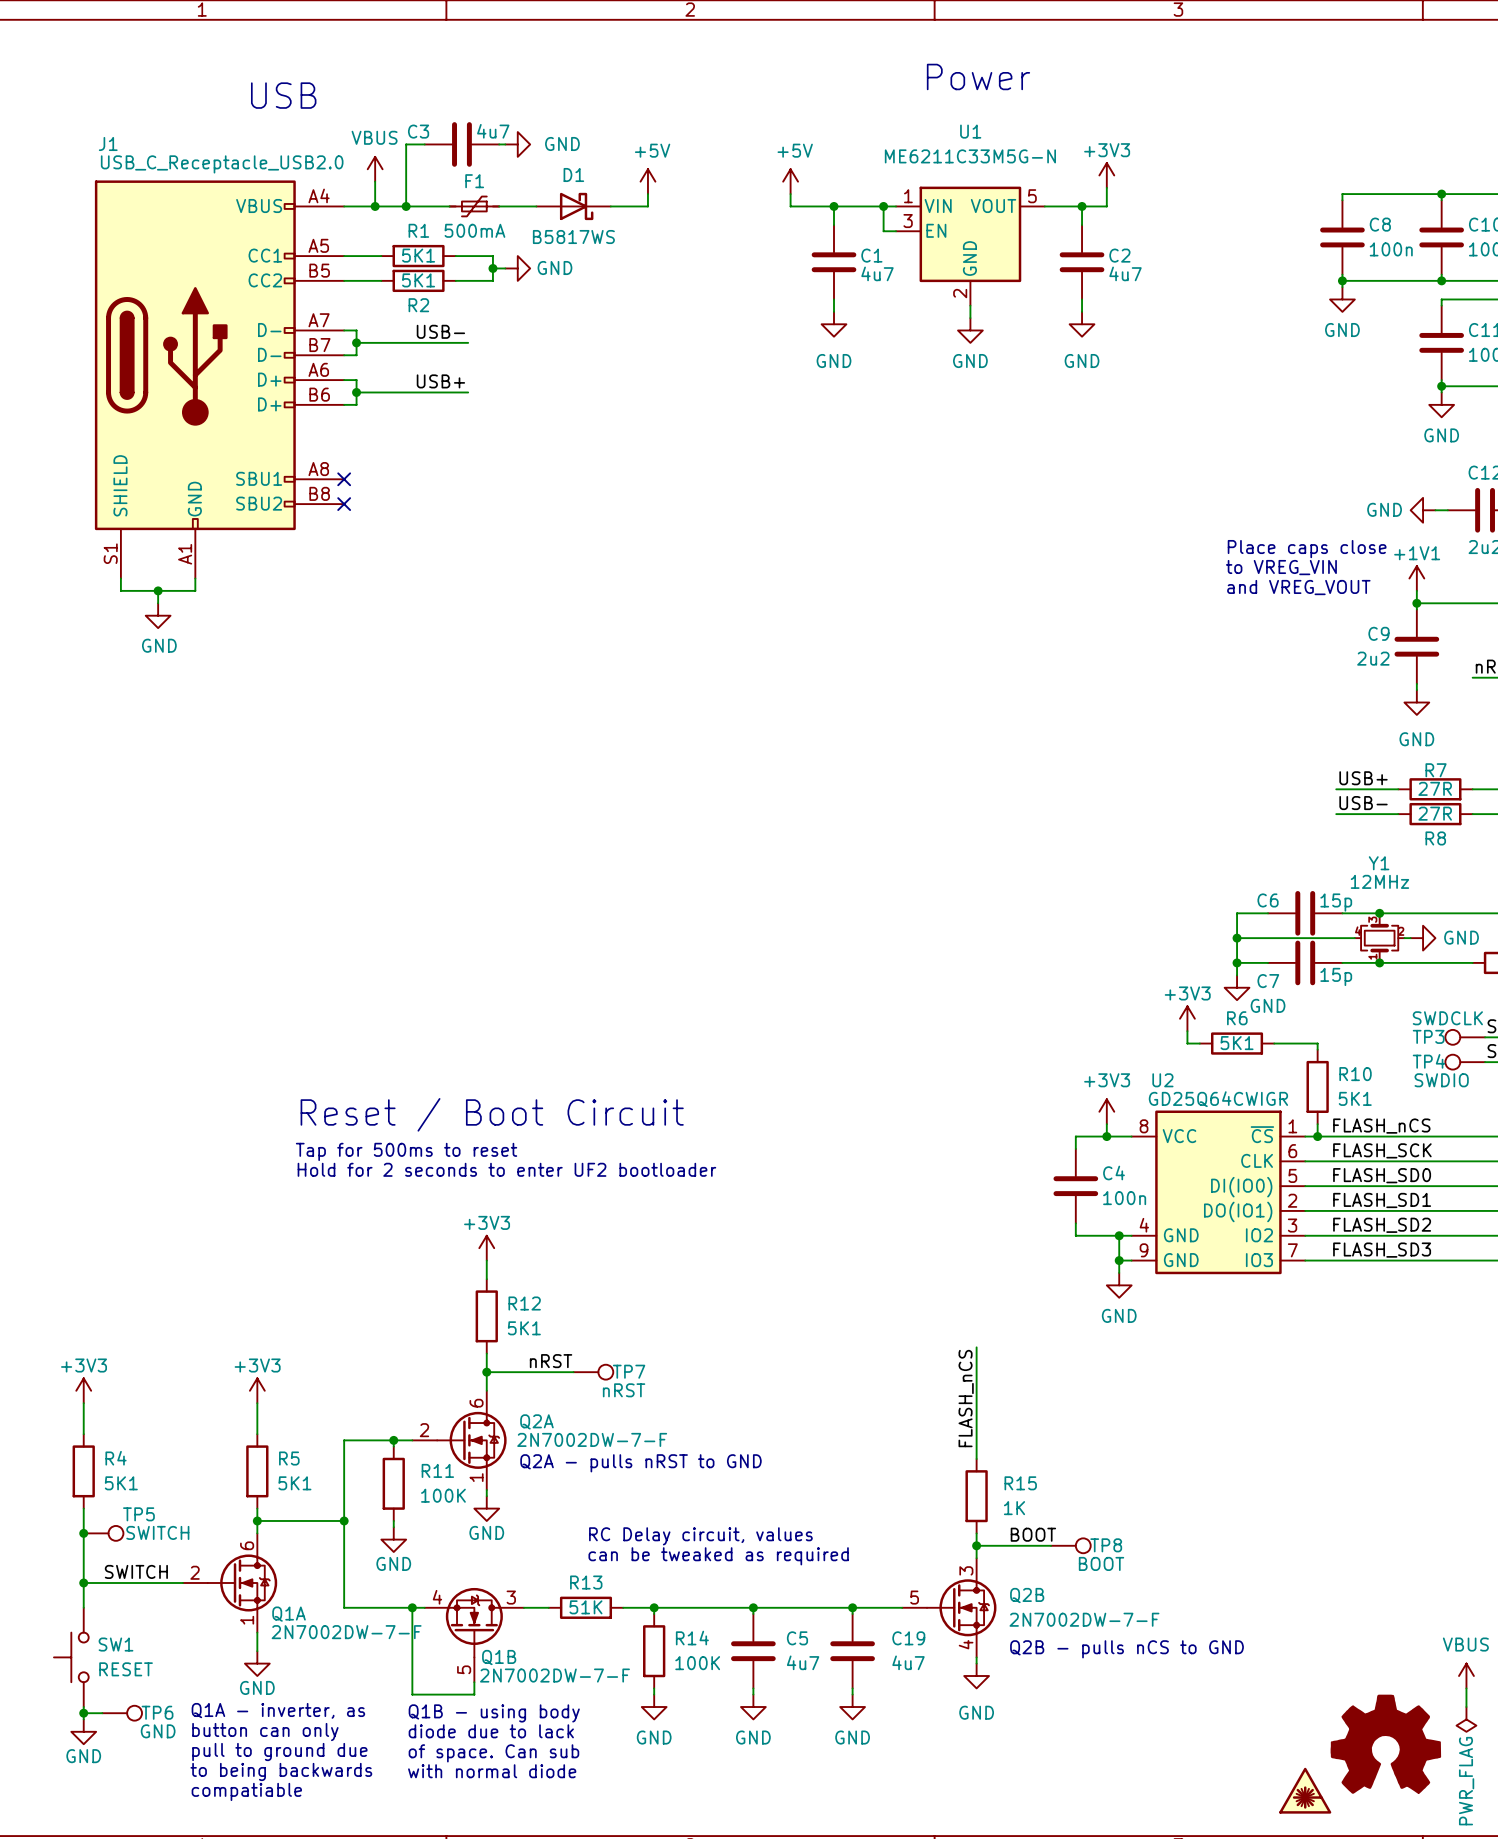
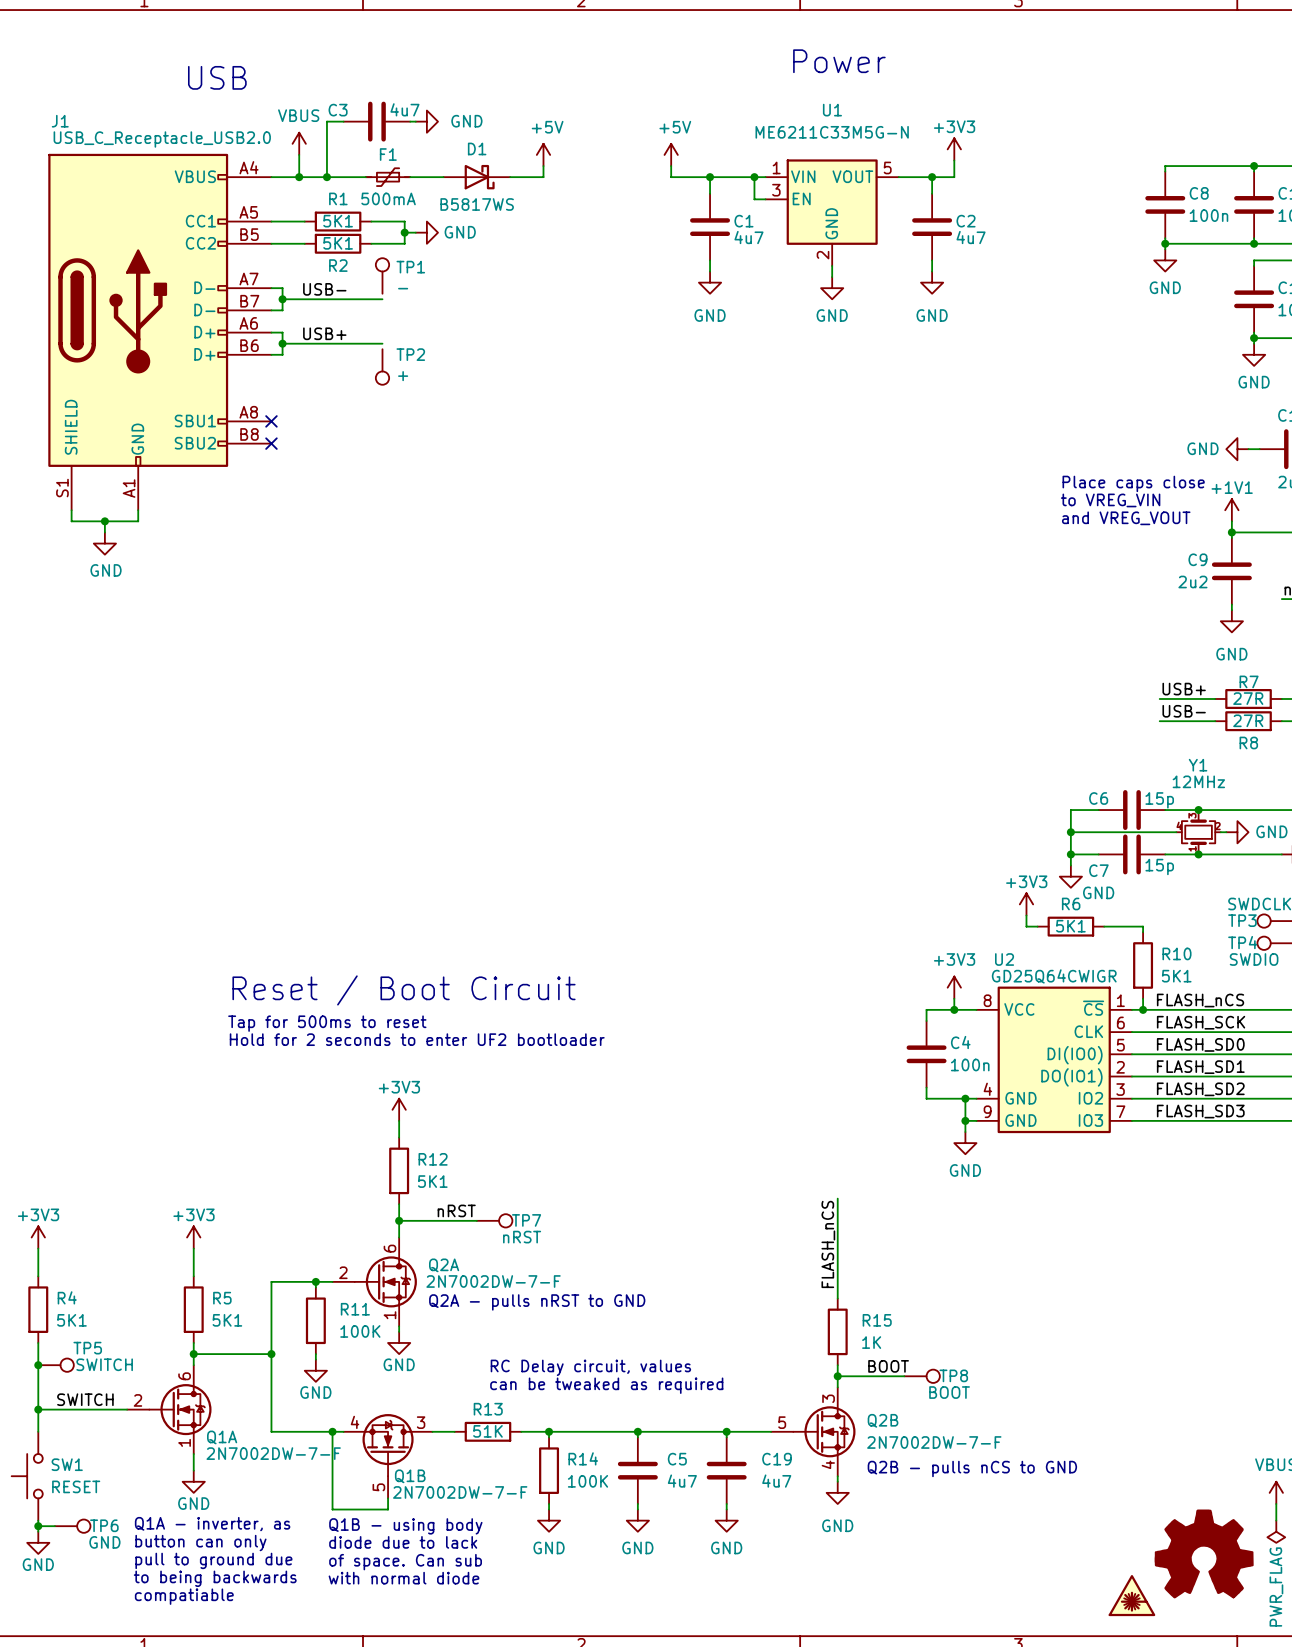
TP1: none -> - (382, 275)
label position: USB- (440, 331) -> USB- (324, 289)
label position: USB+ (440, 381) -> USB+ (324, 333)
TP2: none -> + (382, 367)

